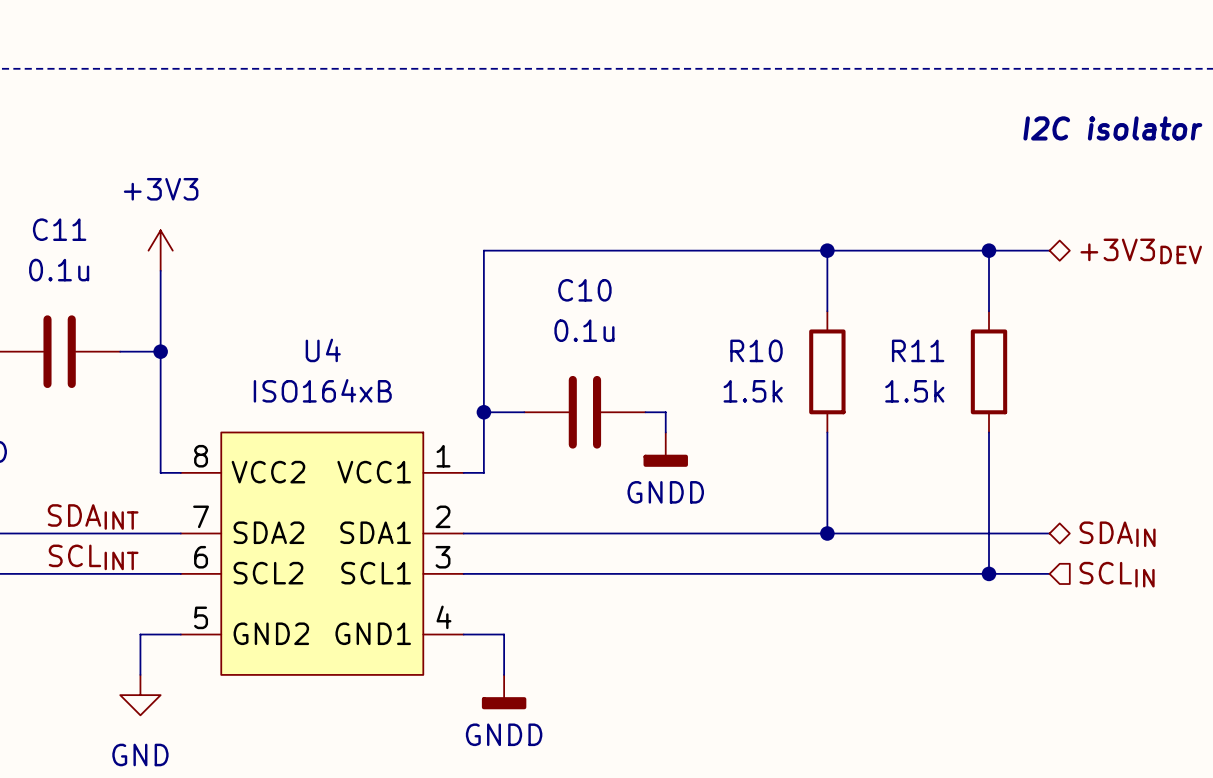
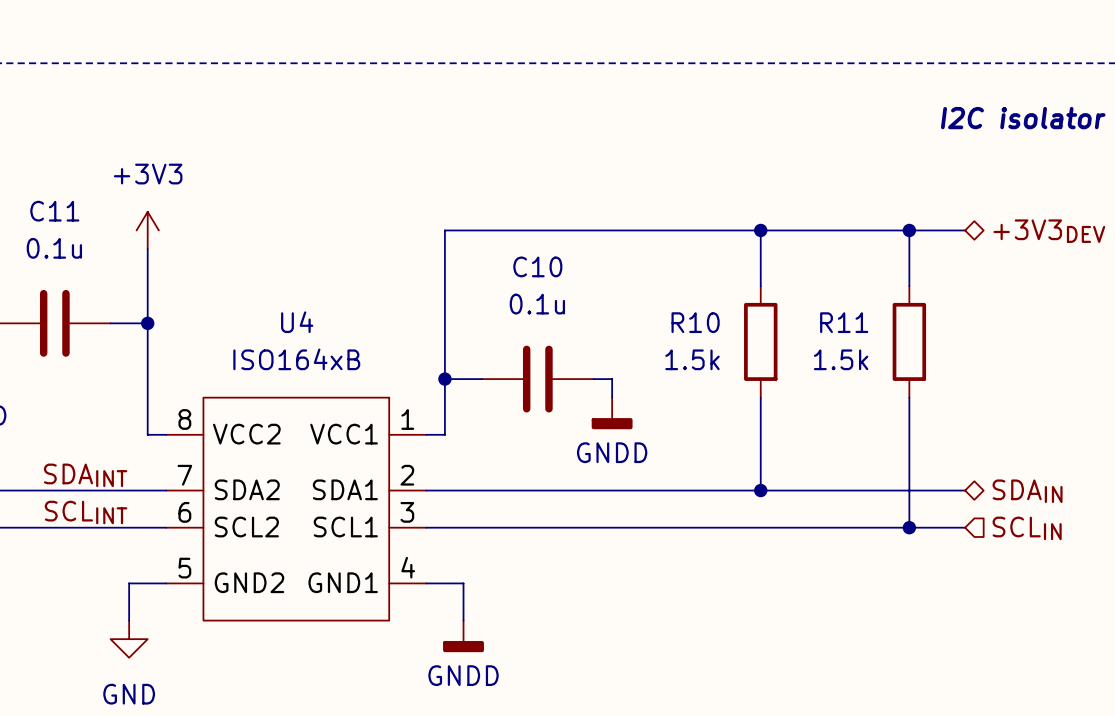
U4 symbol: [180, 432, 464, 675] -> [166, 397, 427, 621]

